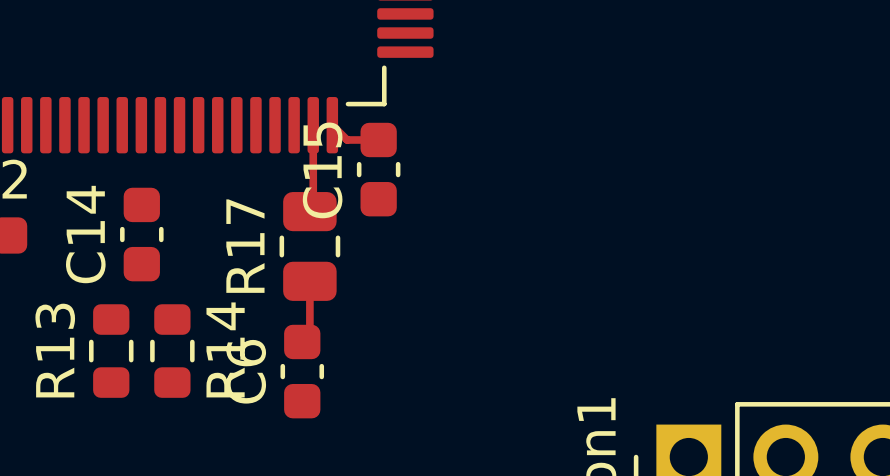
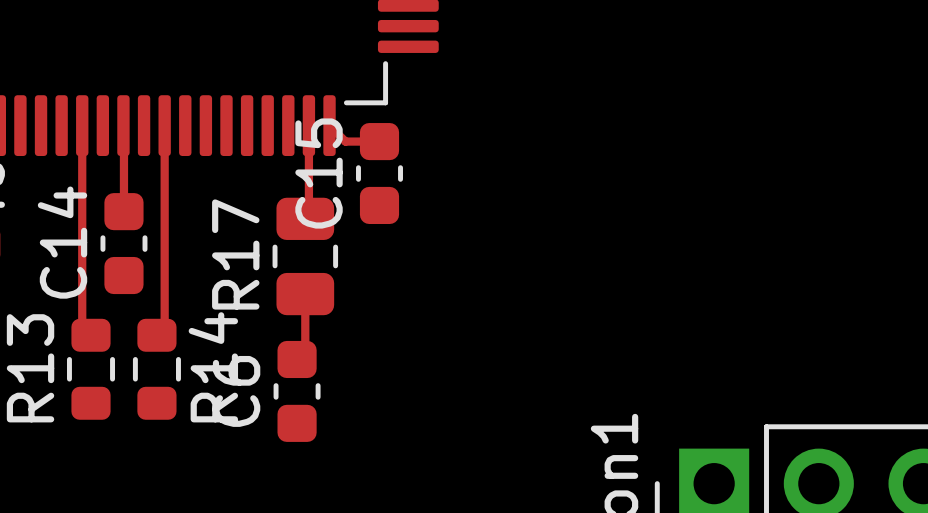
top track: none -> (82, 125) (82, 326)
top track: none -> (123, 126) (123, 211)
top track: none -> (164, 125) (164, 327)

